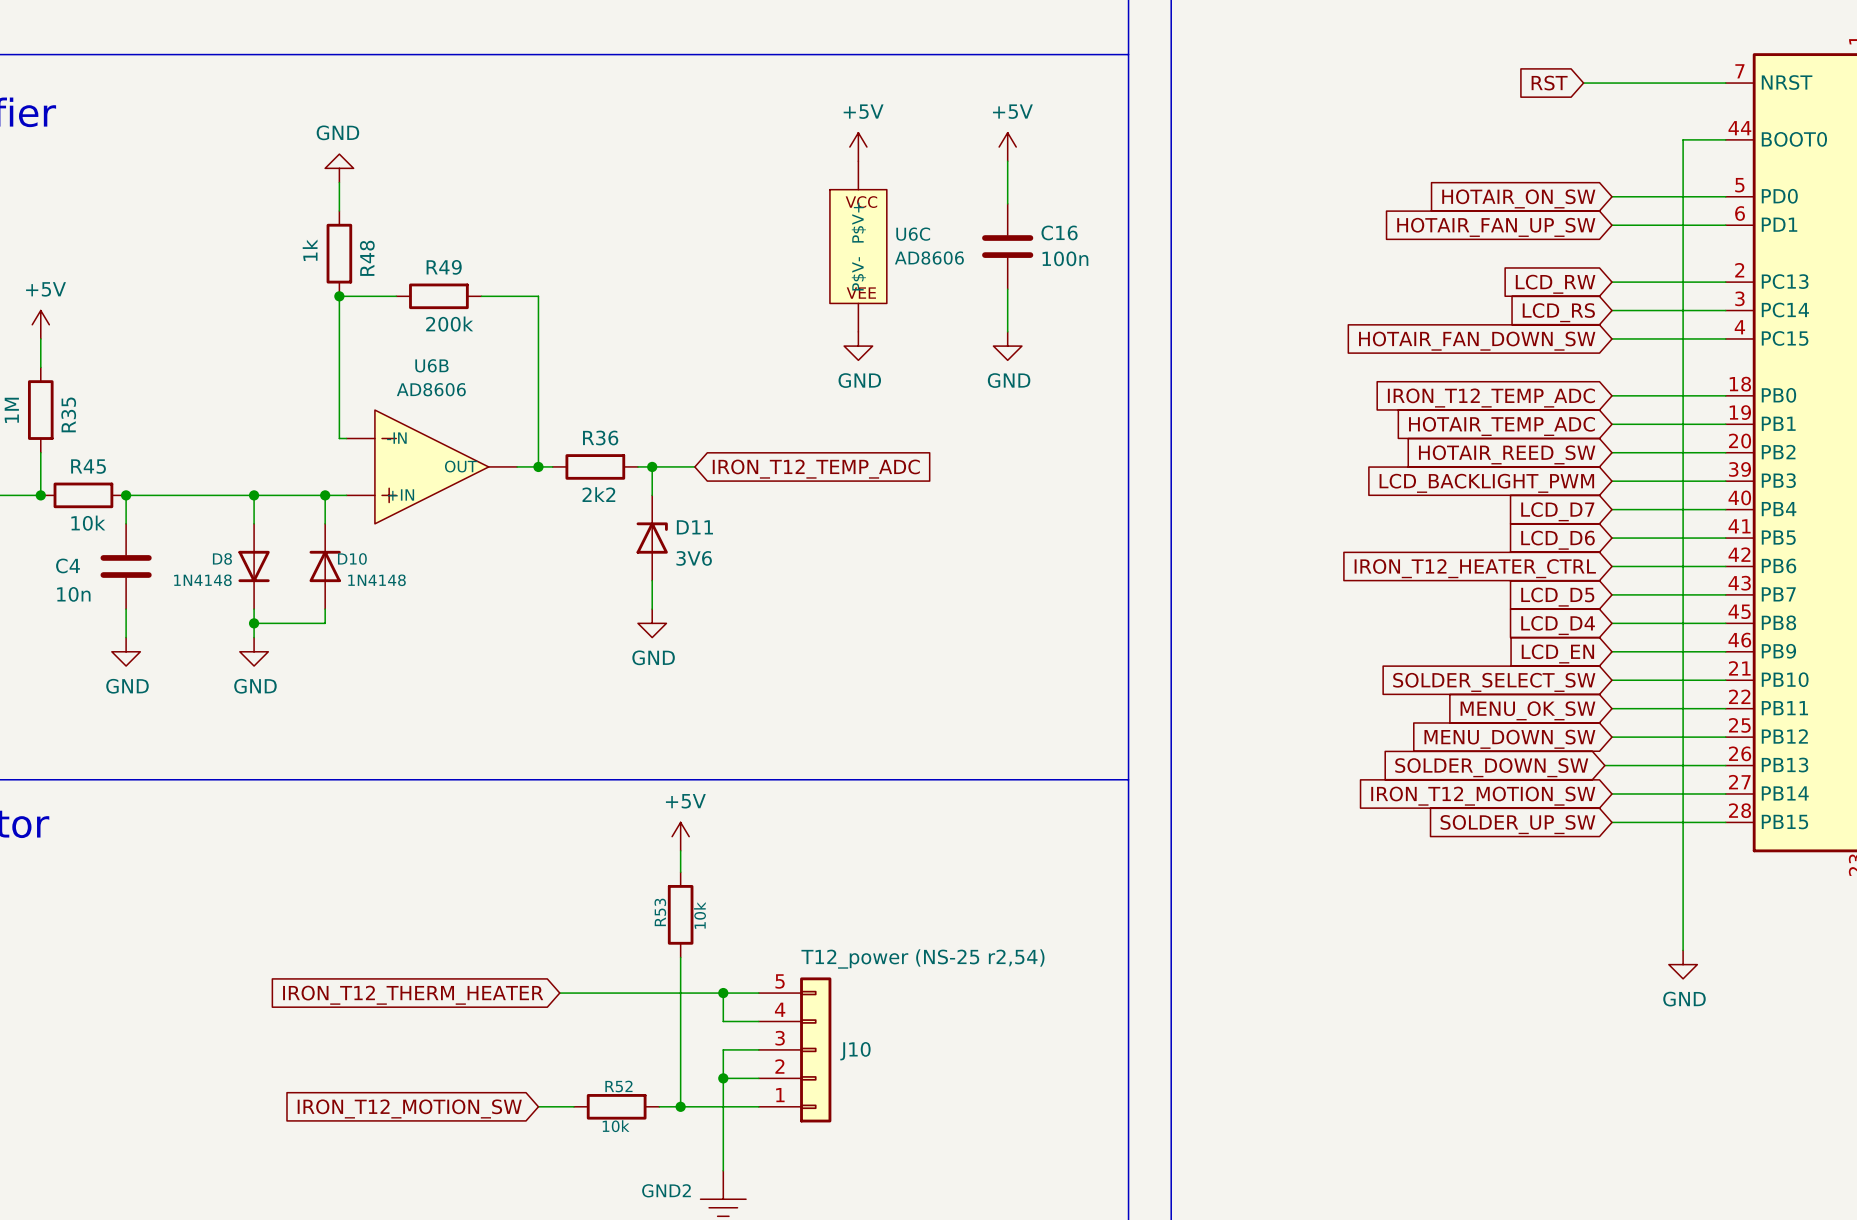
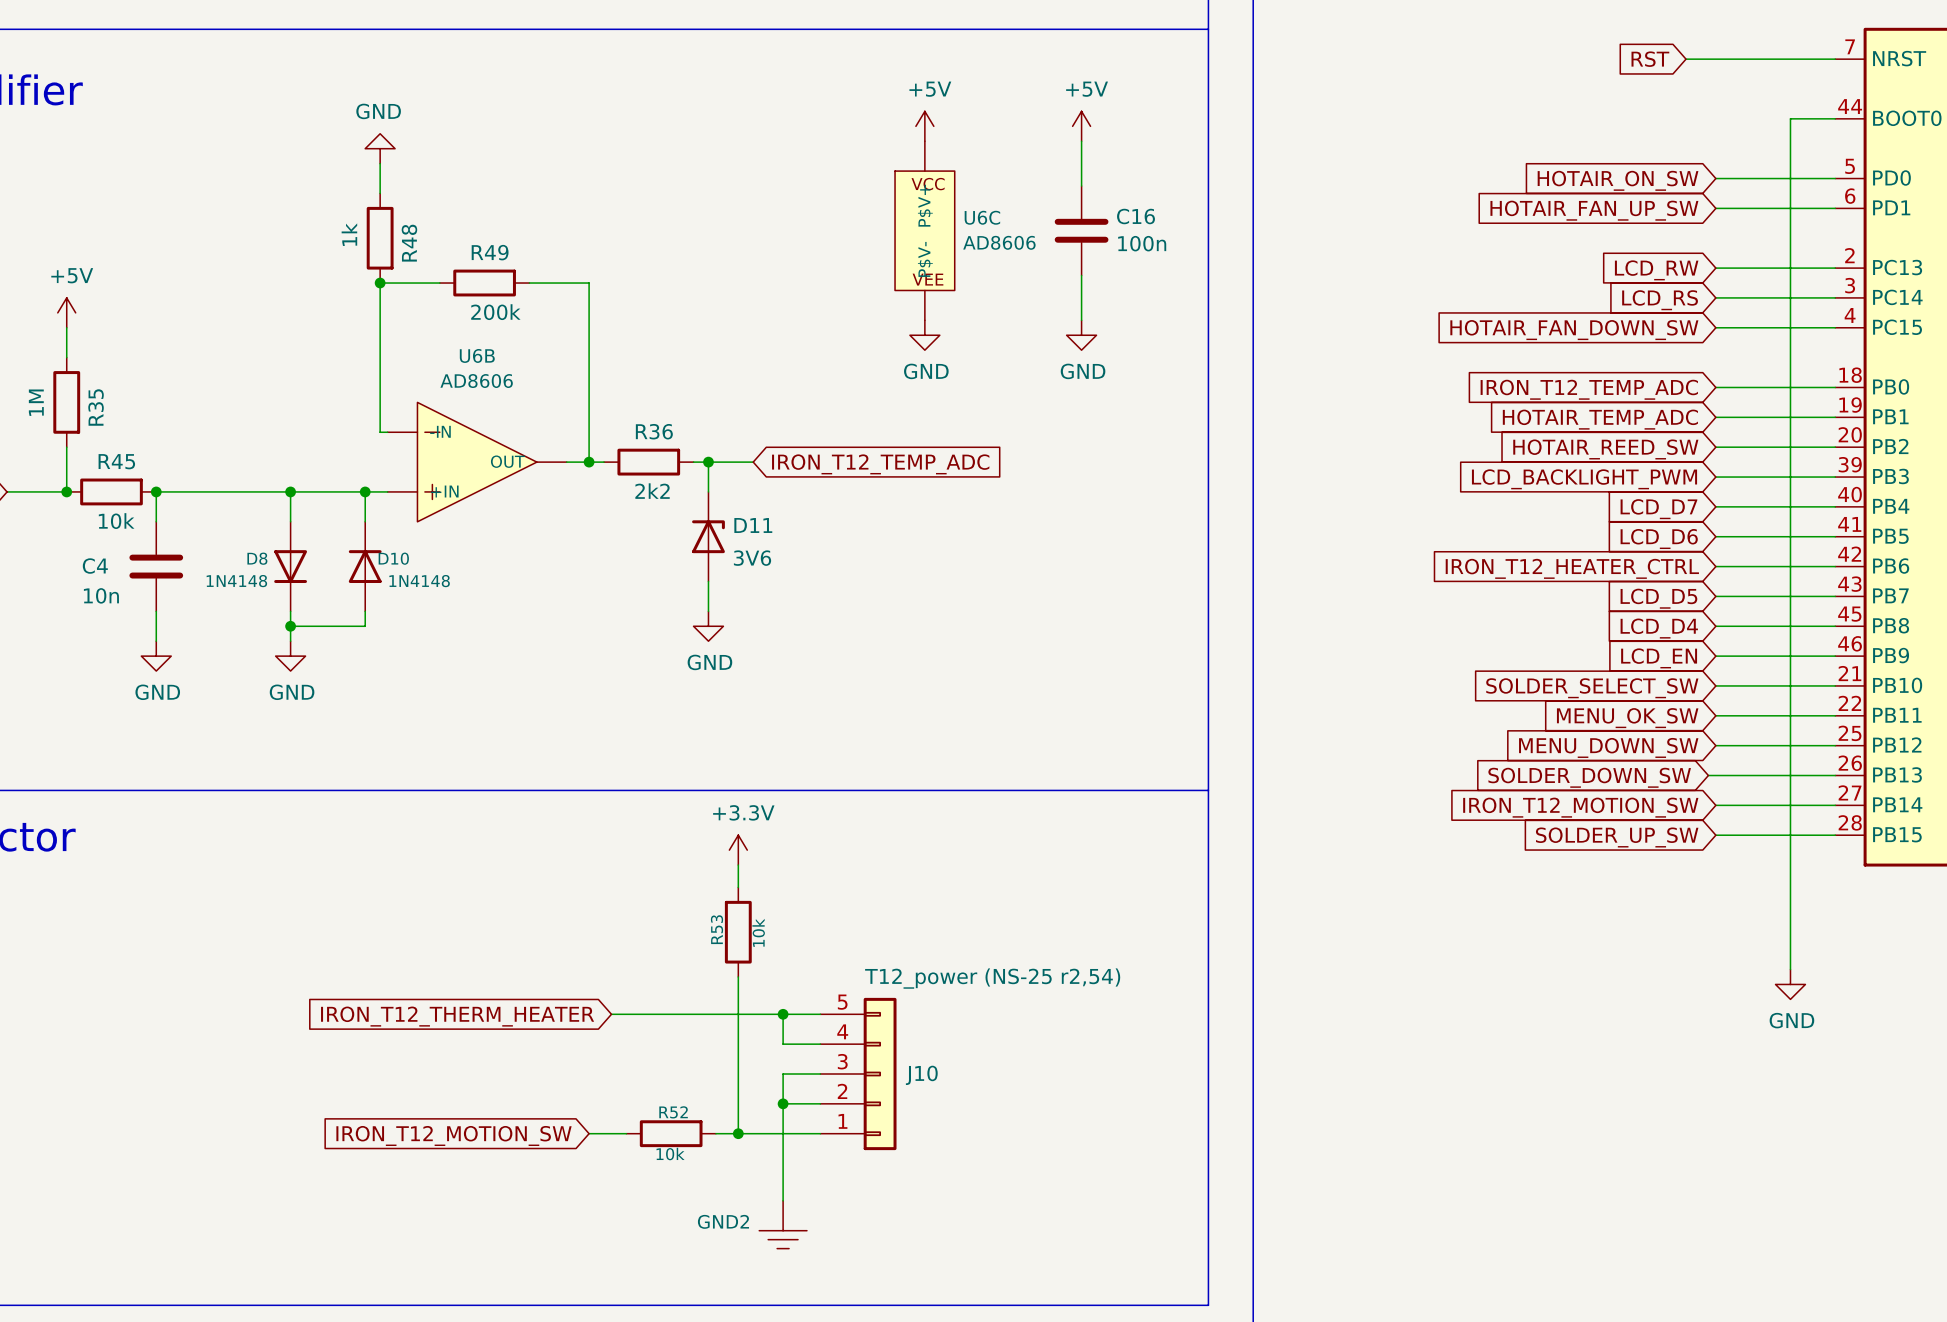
power symbol: +5V (680, 836) -> +3.3V (738, 850)

